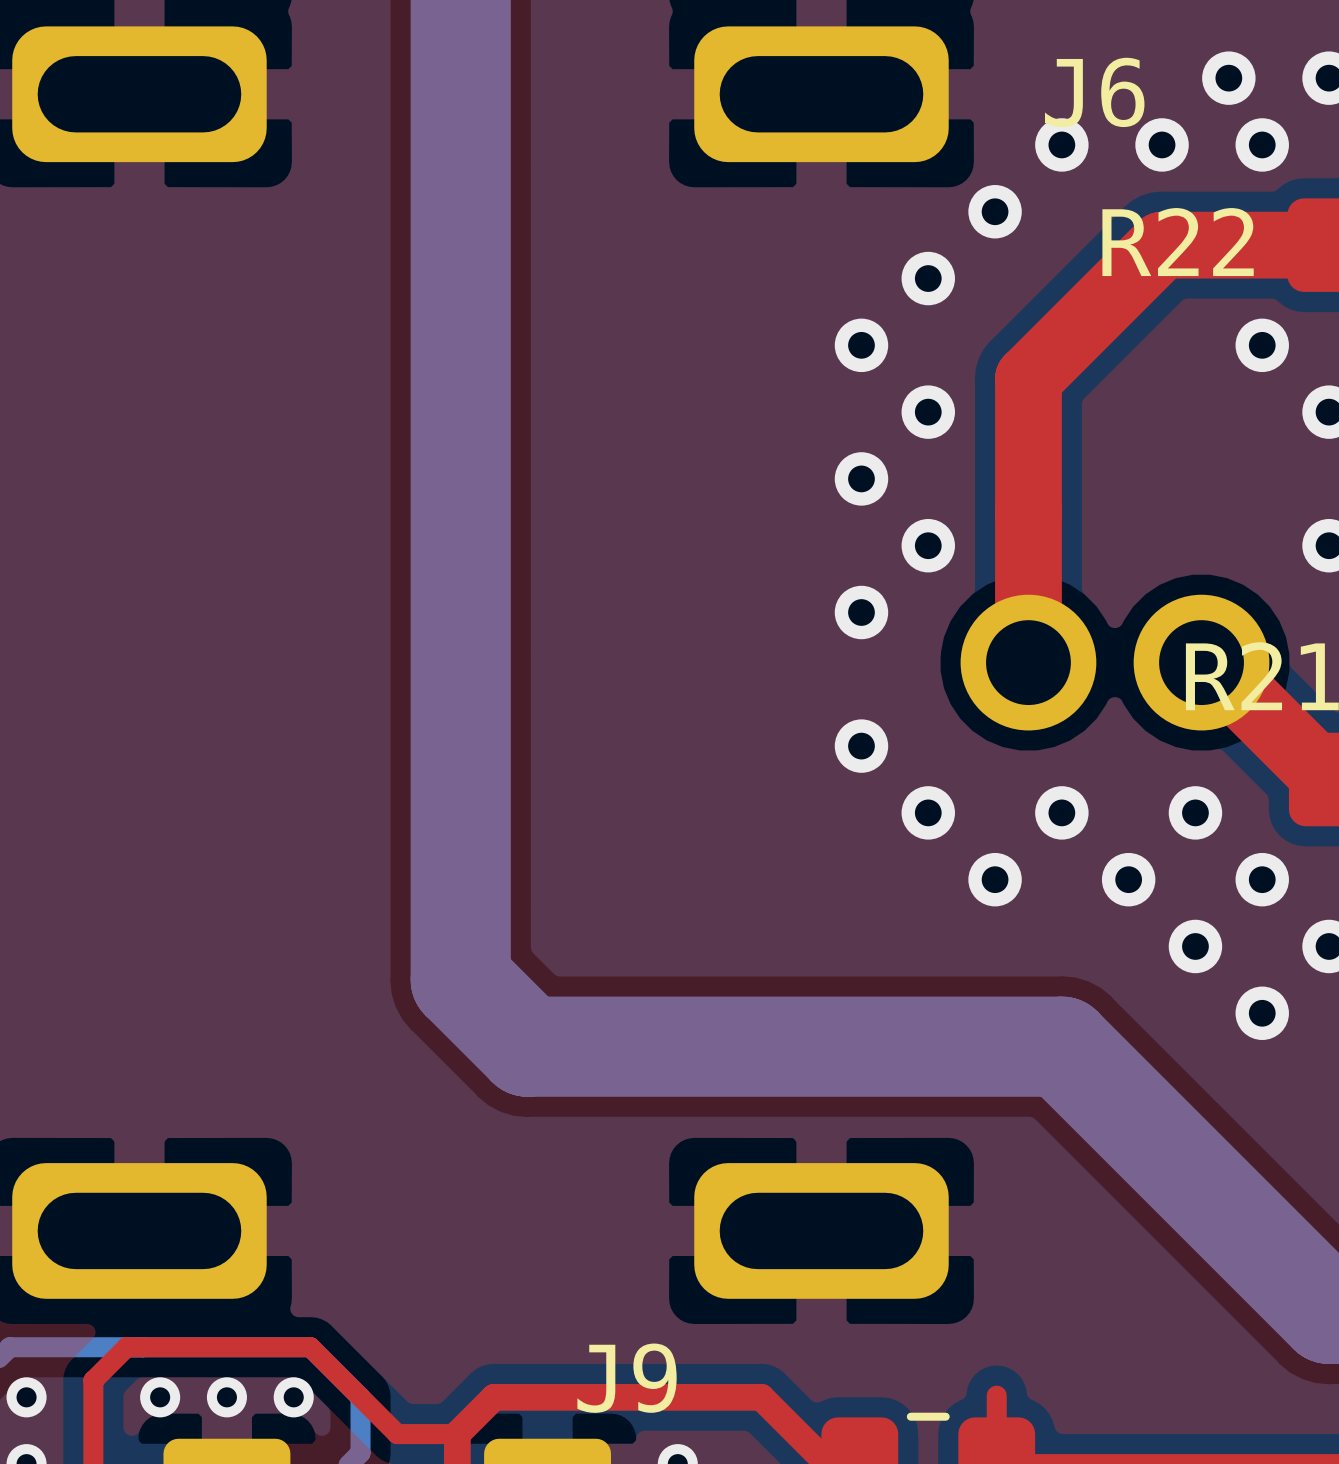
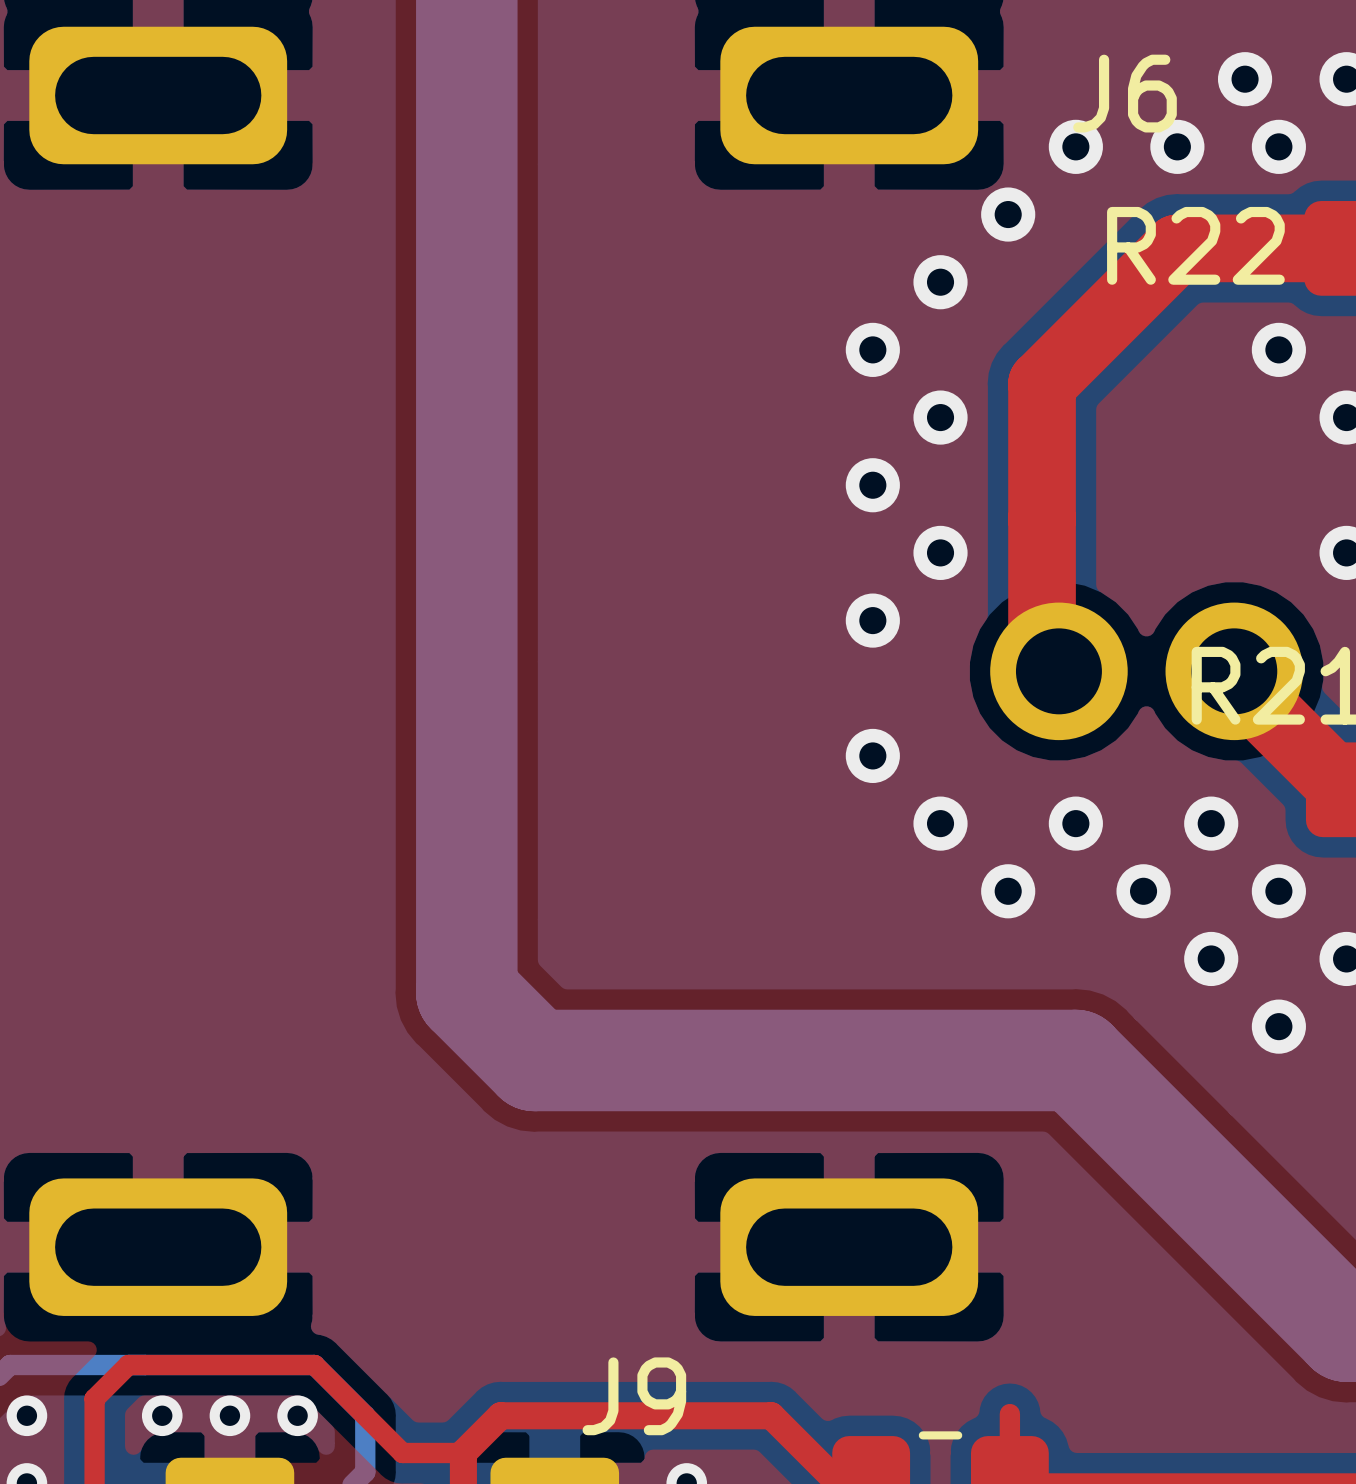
J6 position: (640, 662) -> (666, 671)

